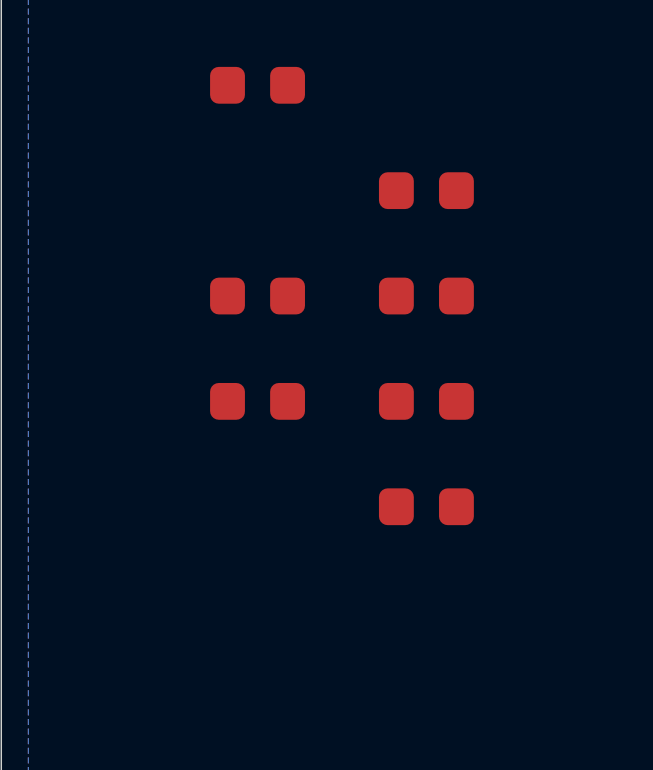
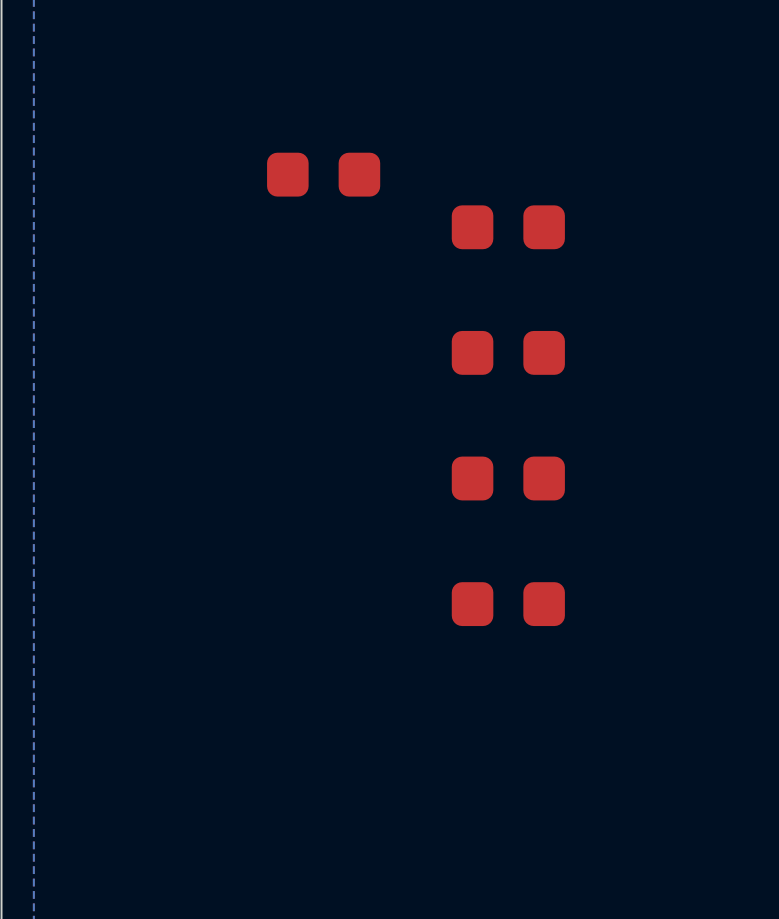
part position: (257, 85) -> (323, 174)
part: (257, 296) -> none
part: (257, 401) -> none

